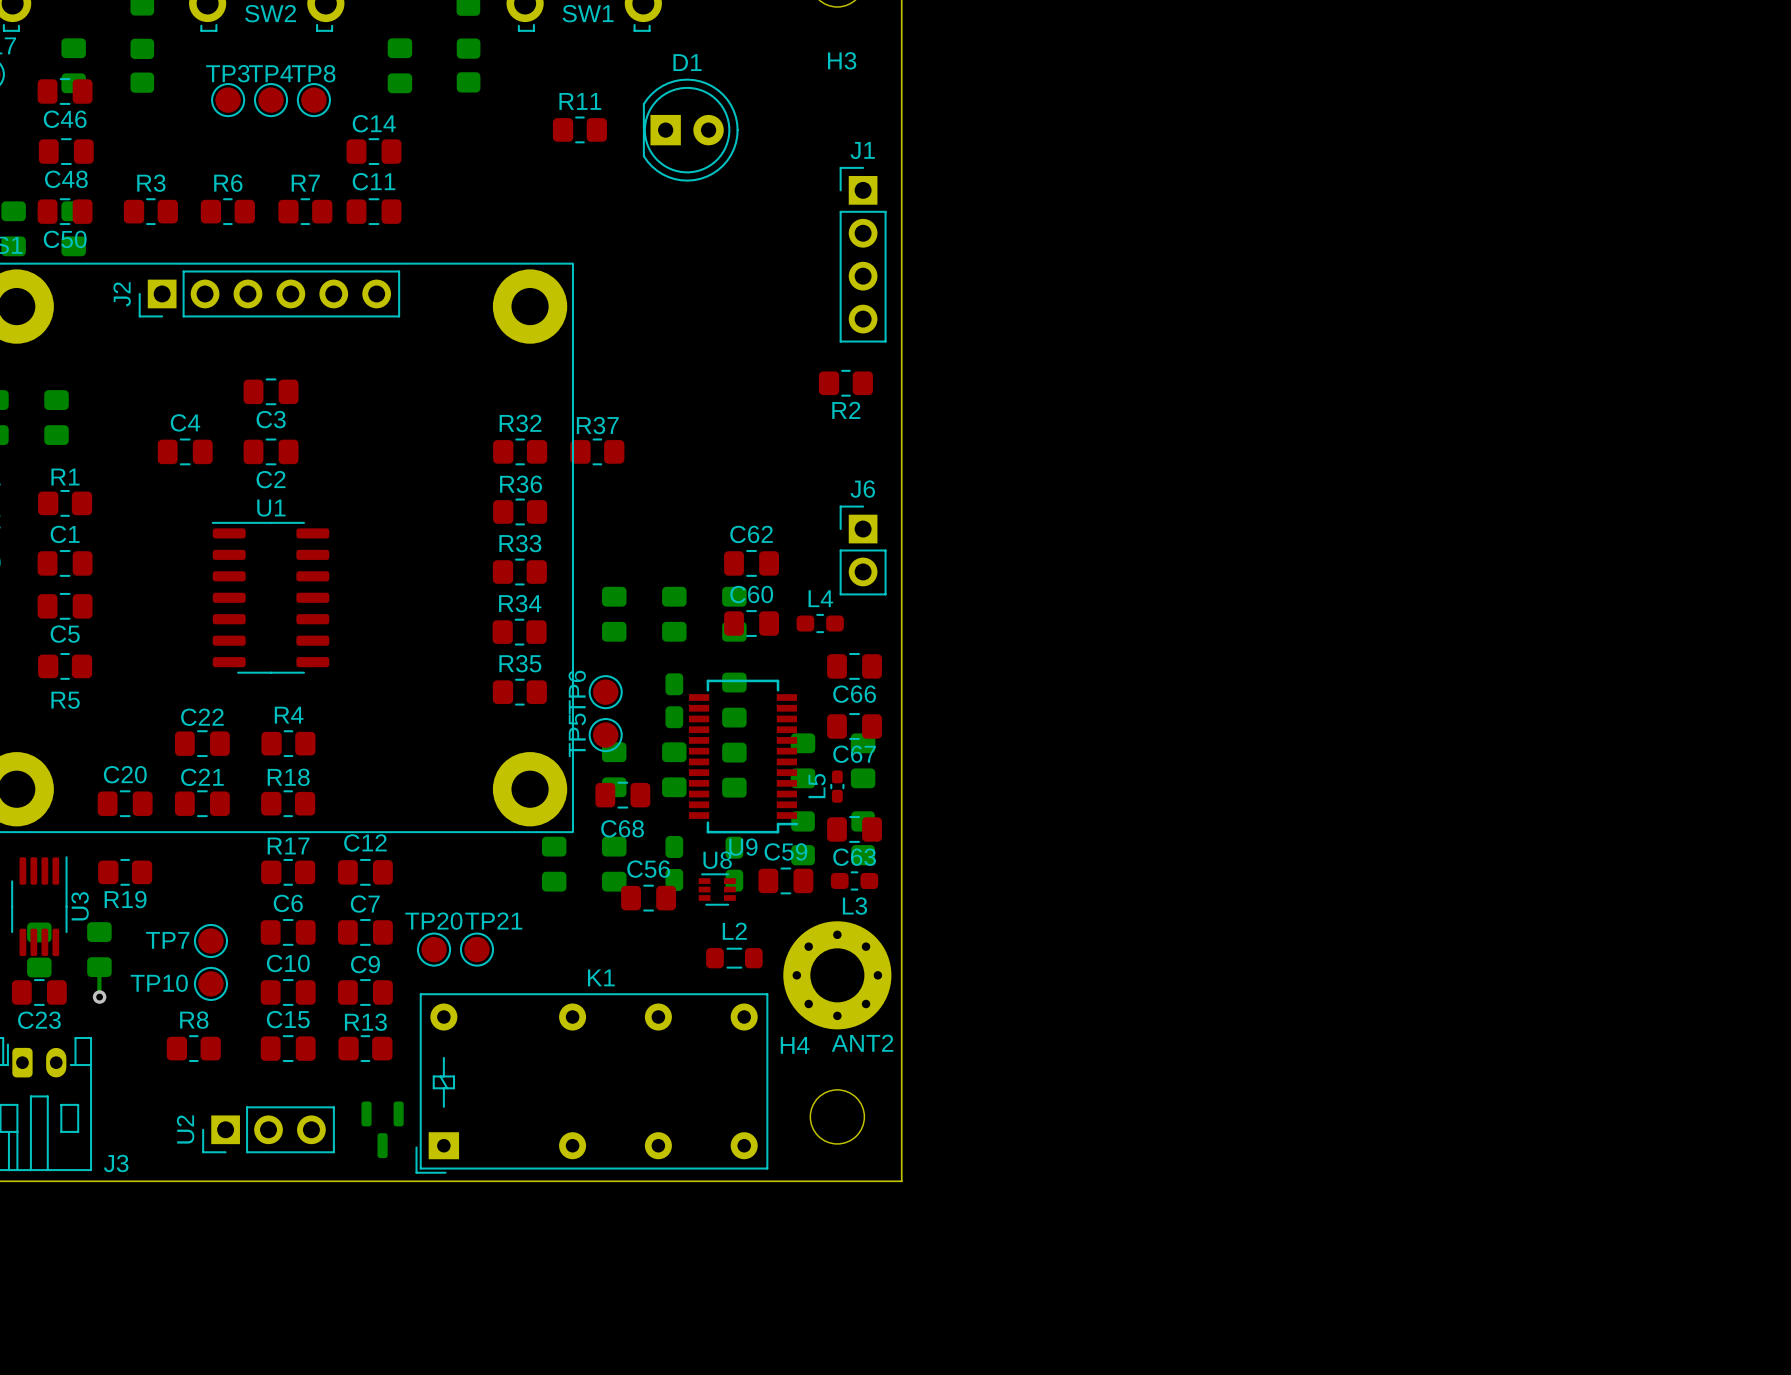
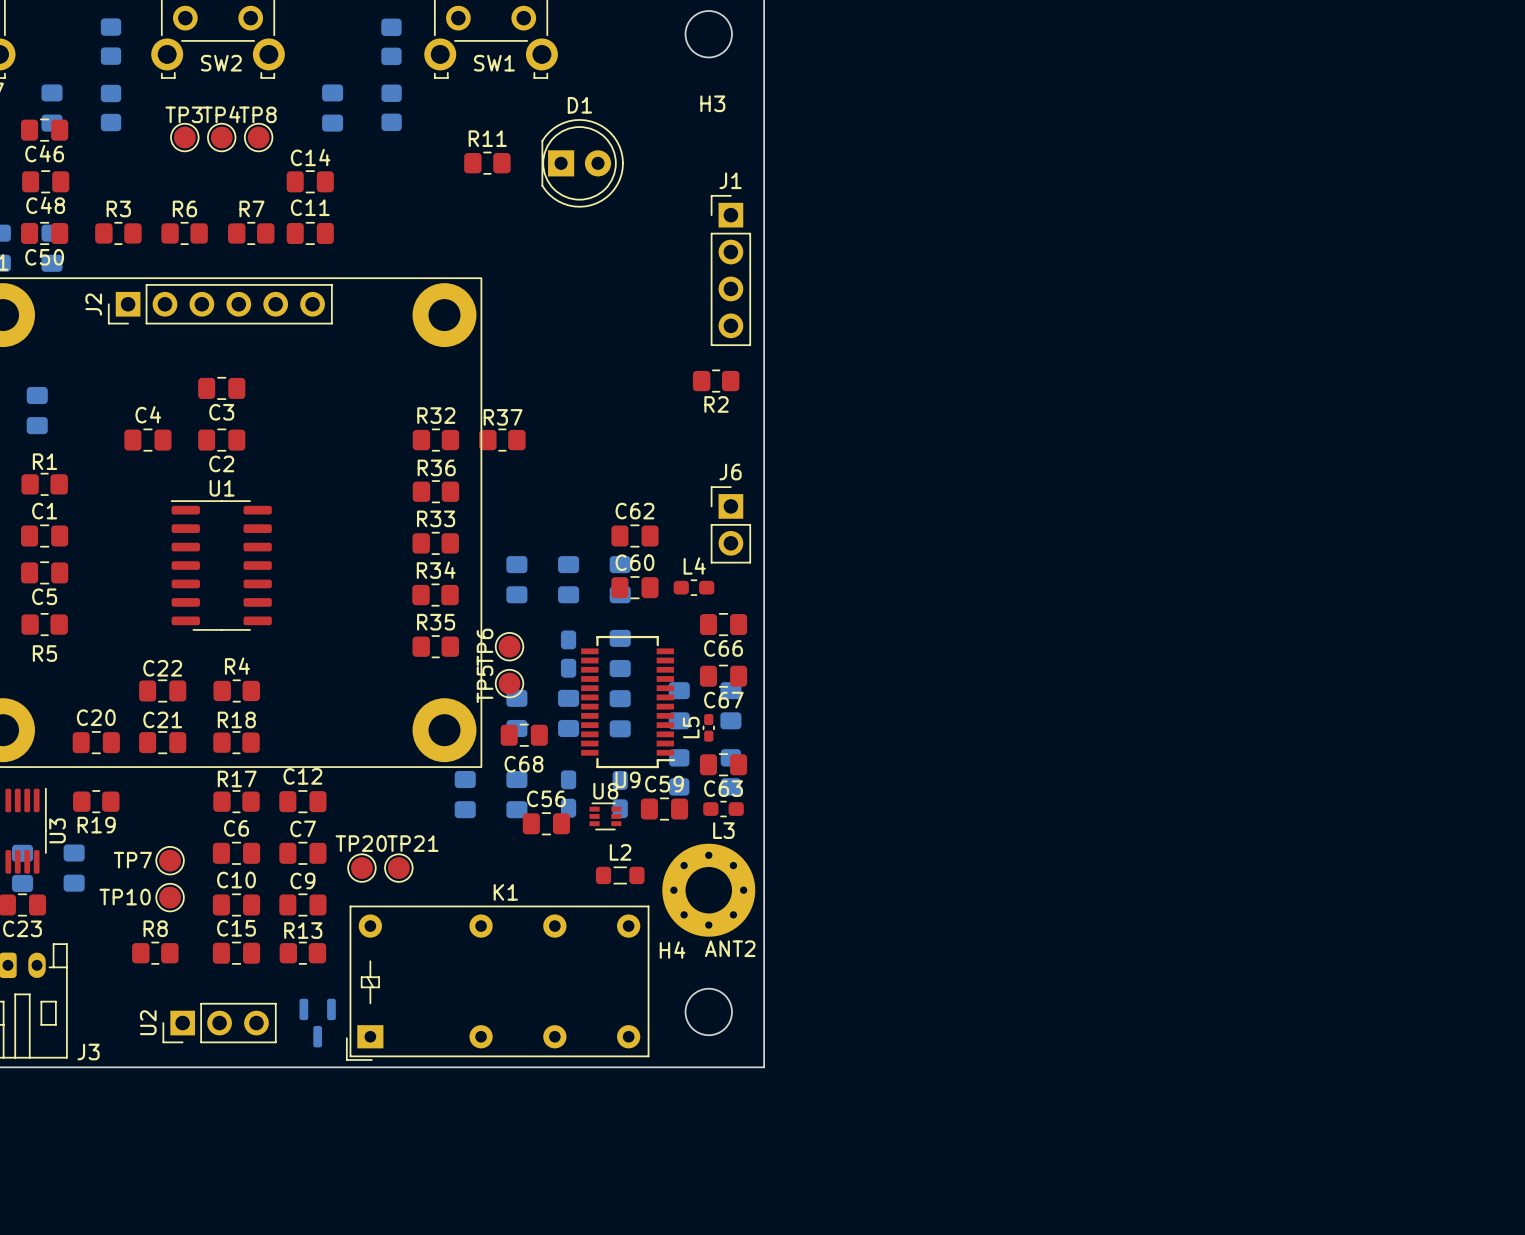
bottom track: (99, 967) (99, 996) -> none
via: (99, 997) -> none

